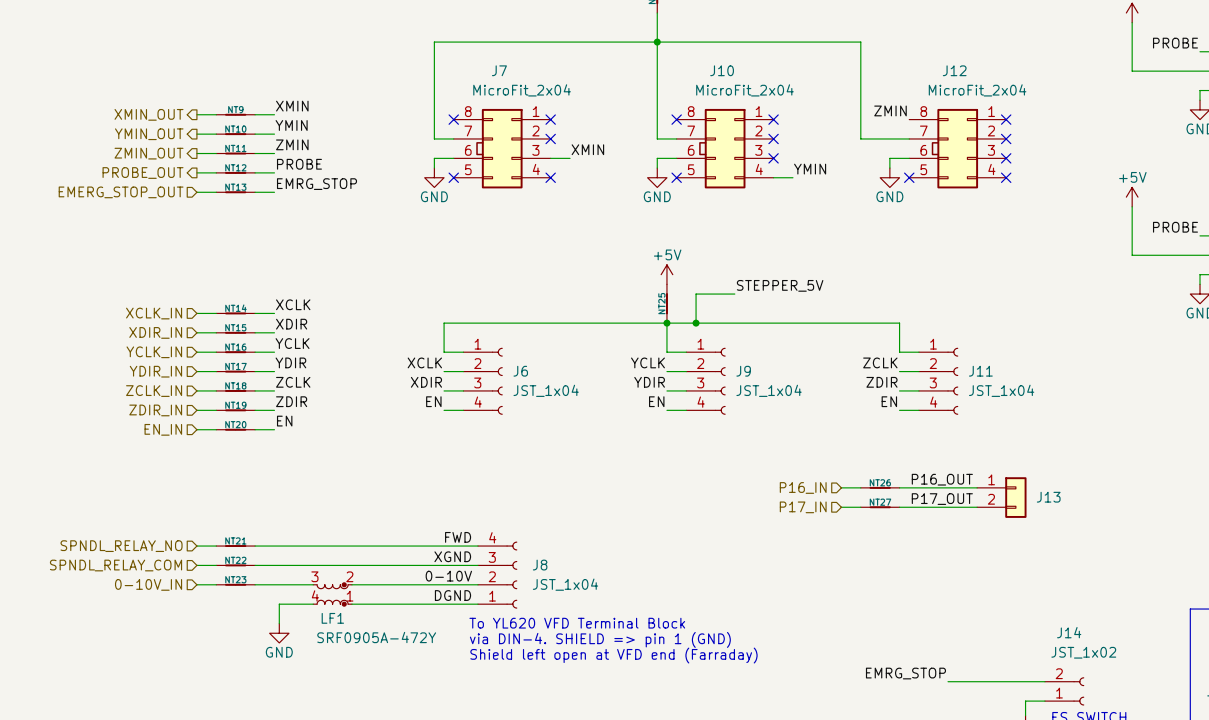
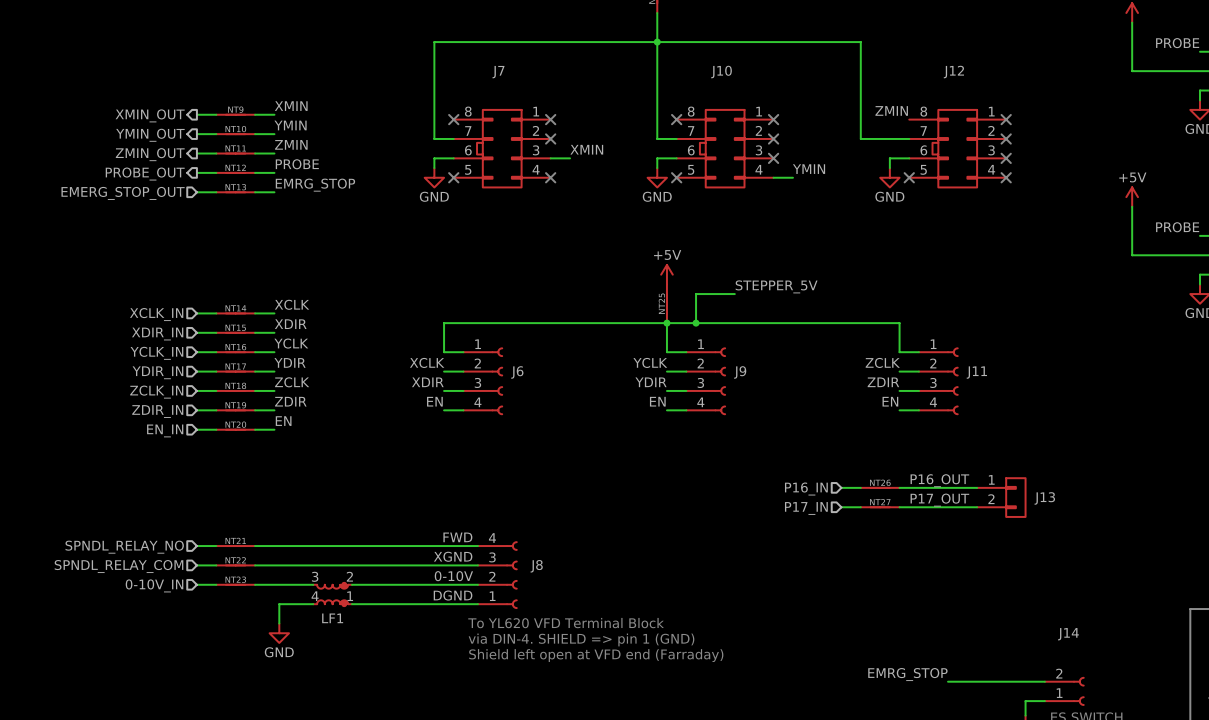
J7 value: MicroFit_2x04 (522, 90) -> none
J10 value: MicroFit_2x04 (744, 90) -> none
J12 value: MicroFit_2x04 (977, 90) -> none
J6 value: JST_1x04 (546, 390) -> none
J9 value: JST_1x04 (769, 390) -> none
J11 value: JST_1x04 (1001, 390) -> none
J8 value: JST_1x04 (565, 584) -> none
LF1 value: SRF0905A-472Y (376, 637) -> none
J14 value: JST_1x02 (1083, 652) -> none

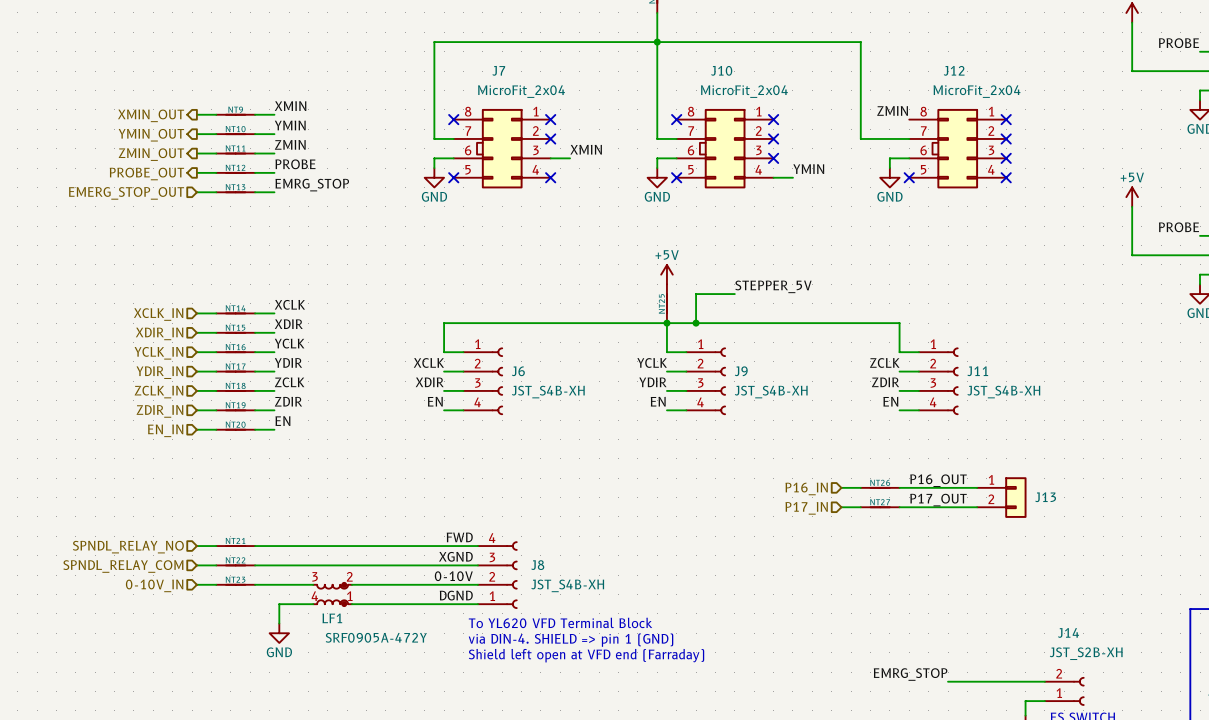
J7 value: none -> MicroFit_2x04 (521, 91)
J10 value: none -> MicroFit_2x04 (744, 91)
J12 value: none -> MicroFit_2x04 (977, 91)
J6 value: none -> JST_S4B-XH (548, 392)
J9 value: none -> JST_S4B-XH (771, 392)
J11 value: none -> JST_S4B-XH (1003, 392)
J8 value: none -> JST_S4B-XH (567, 585)
LF1 value: none -> SRF0905A-472Y (376, 637)
J14 value: none -> JST_S2B-XH (1086, 653)

